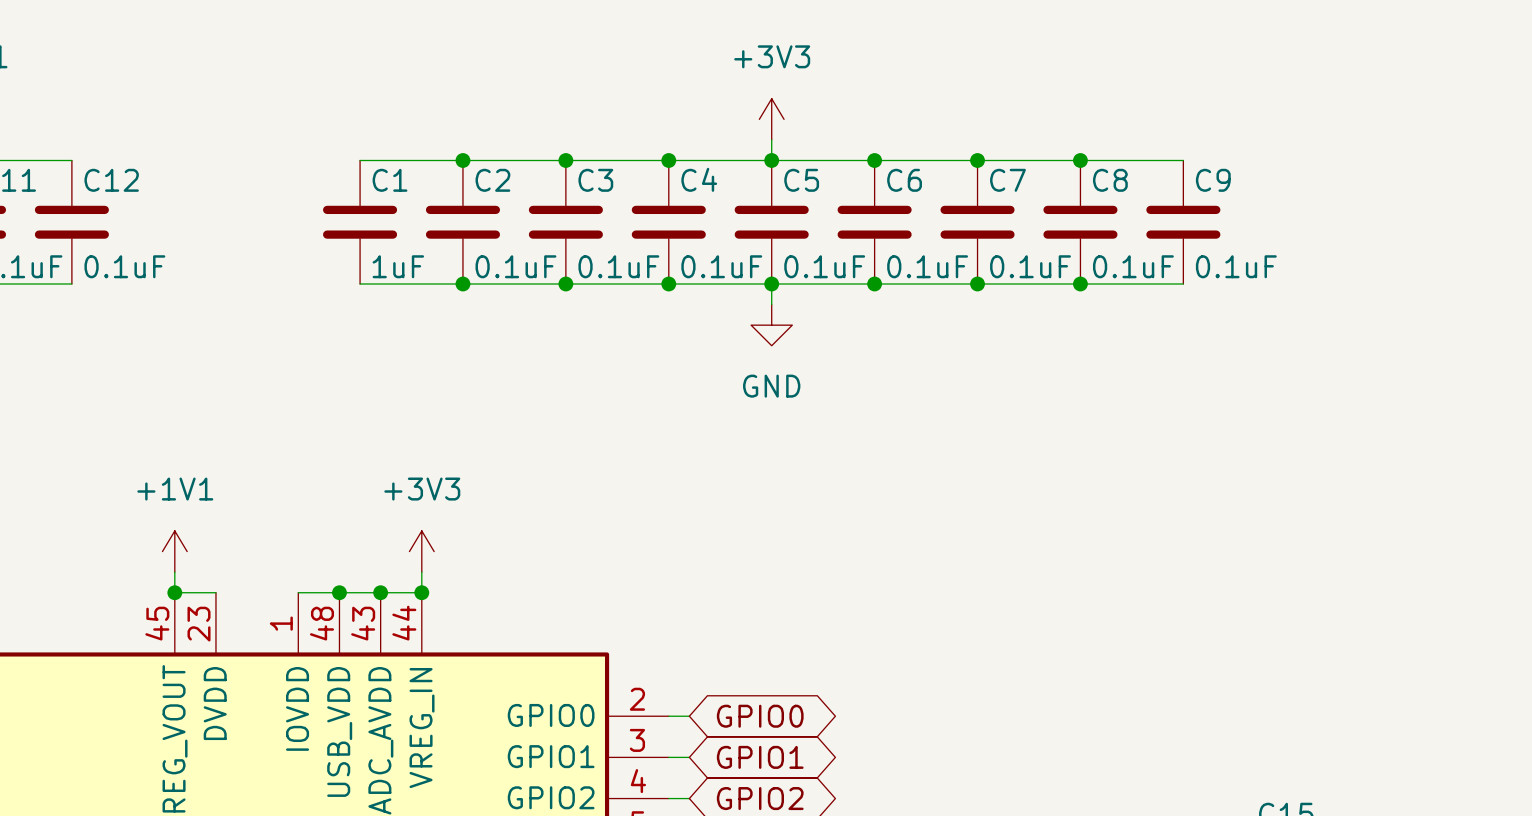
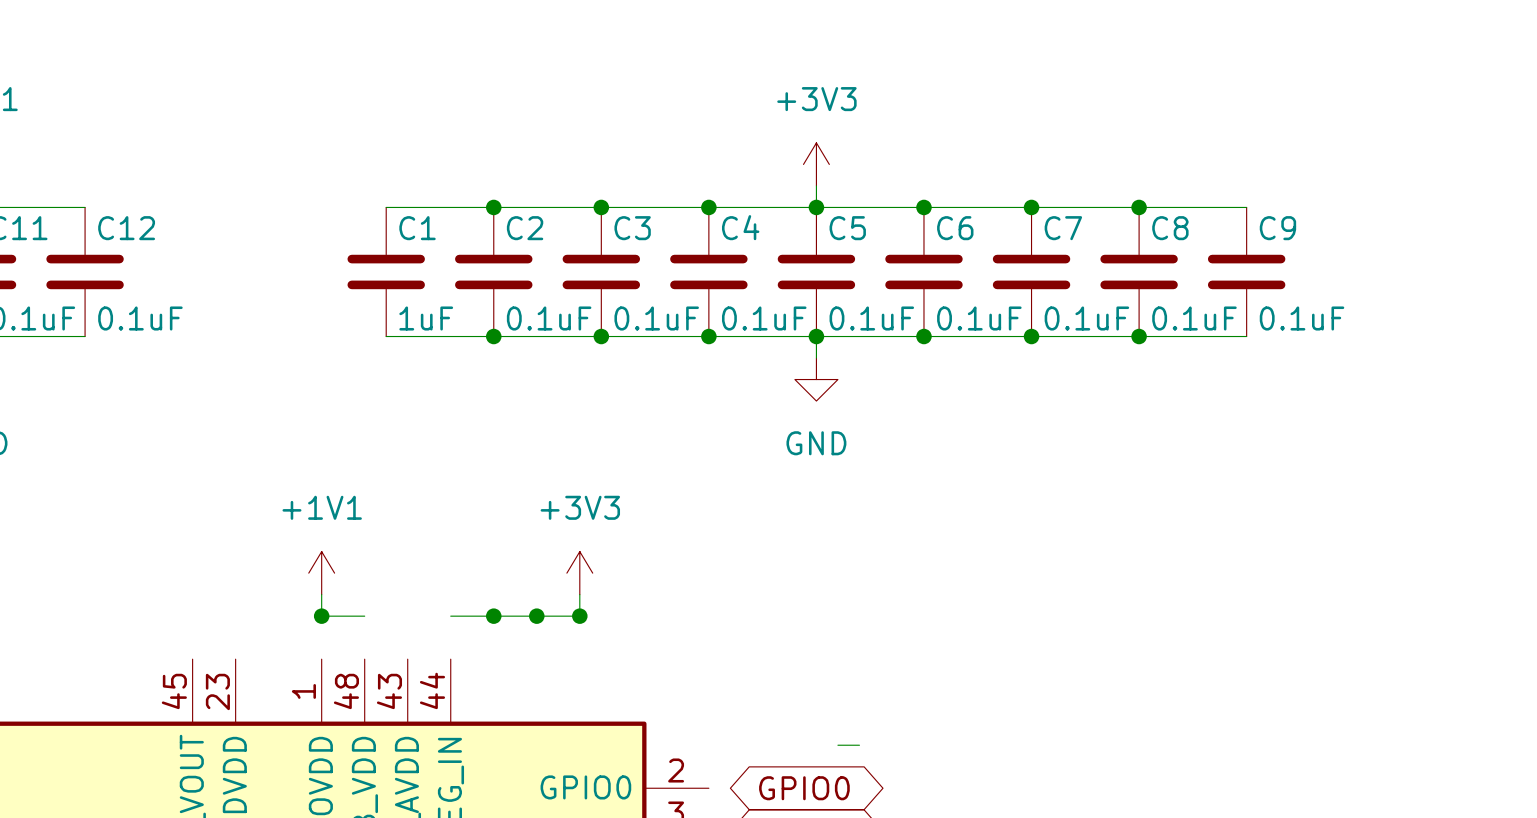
power symbol position: +1V1 (174, 551) -> +1V1 (321, 573)
junction: none -> (321, 616)
power symbol position: +3V3 (421, 551) -> +3V3 (579, 573)
junction: none -> (493, 616)
junction: none -> (536, 616)
junction: none -> (579, 616)
wire: (174, 572) (174, 592) (215, 592) -> (321, 594) (321, 616) (364, 616)
wire: (421, 572) (421, 592) (298, 592) -> (579, 594) (579, 616) (450, 616)
junction: (174, 592) -> none
junction: (339, 592) -> none
junction: (380, 592) -> none
junction: (421, 592) -> none
wire: (668, 716) (689, 716) -> (837, 745) (859, 745)

